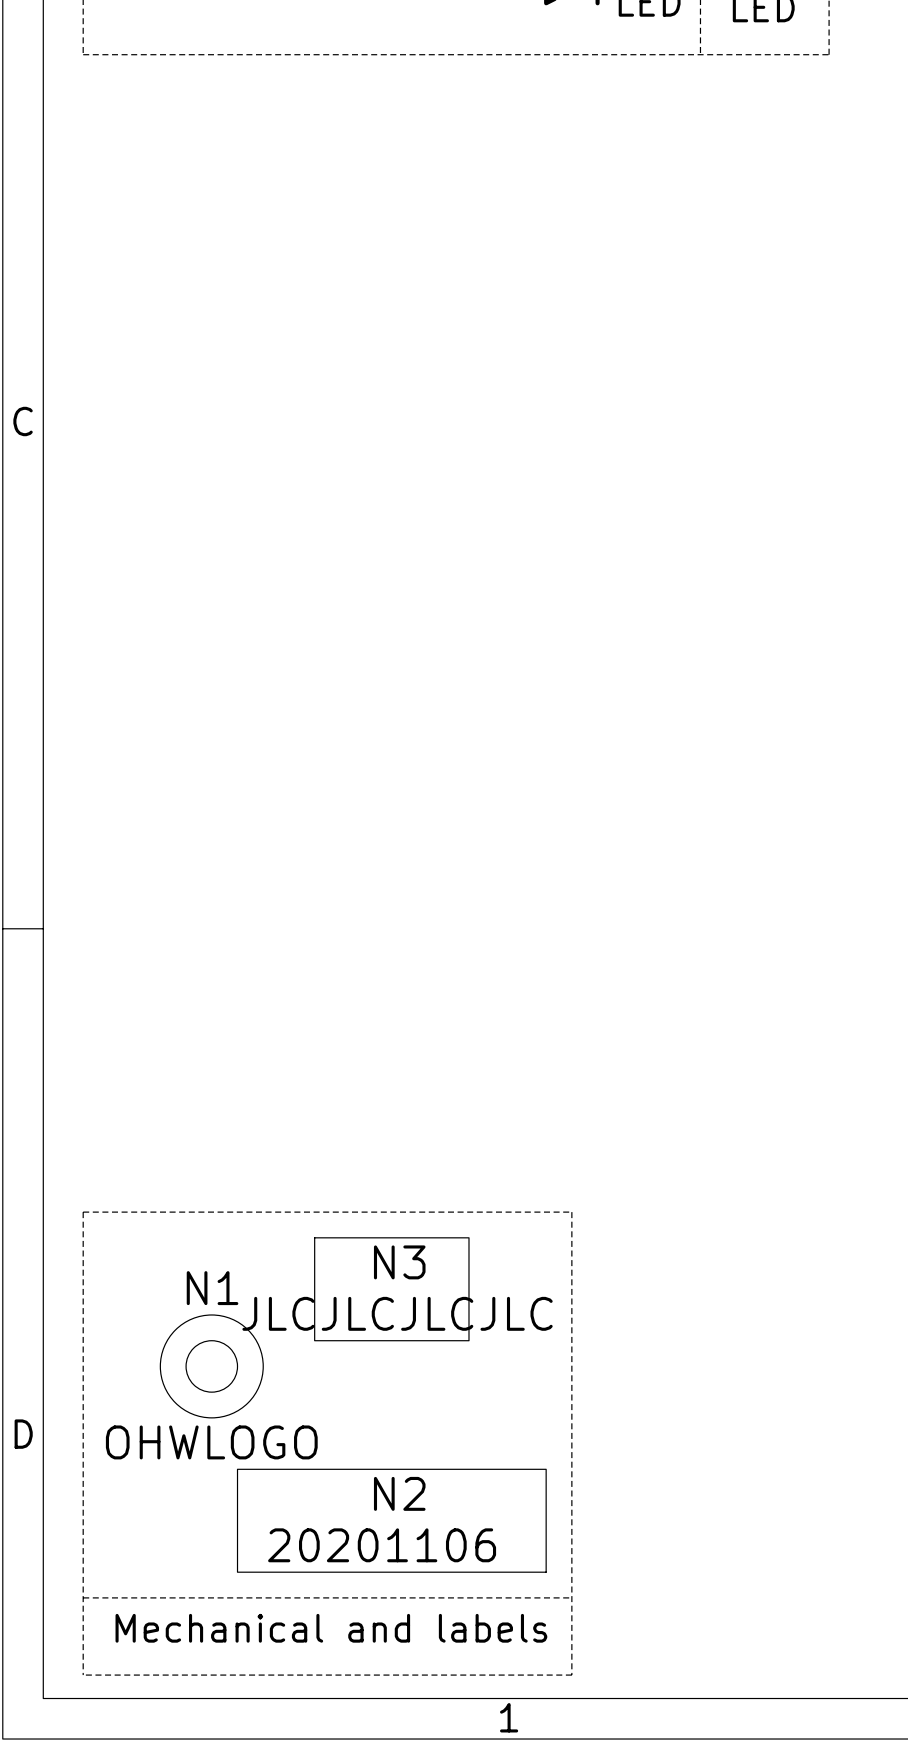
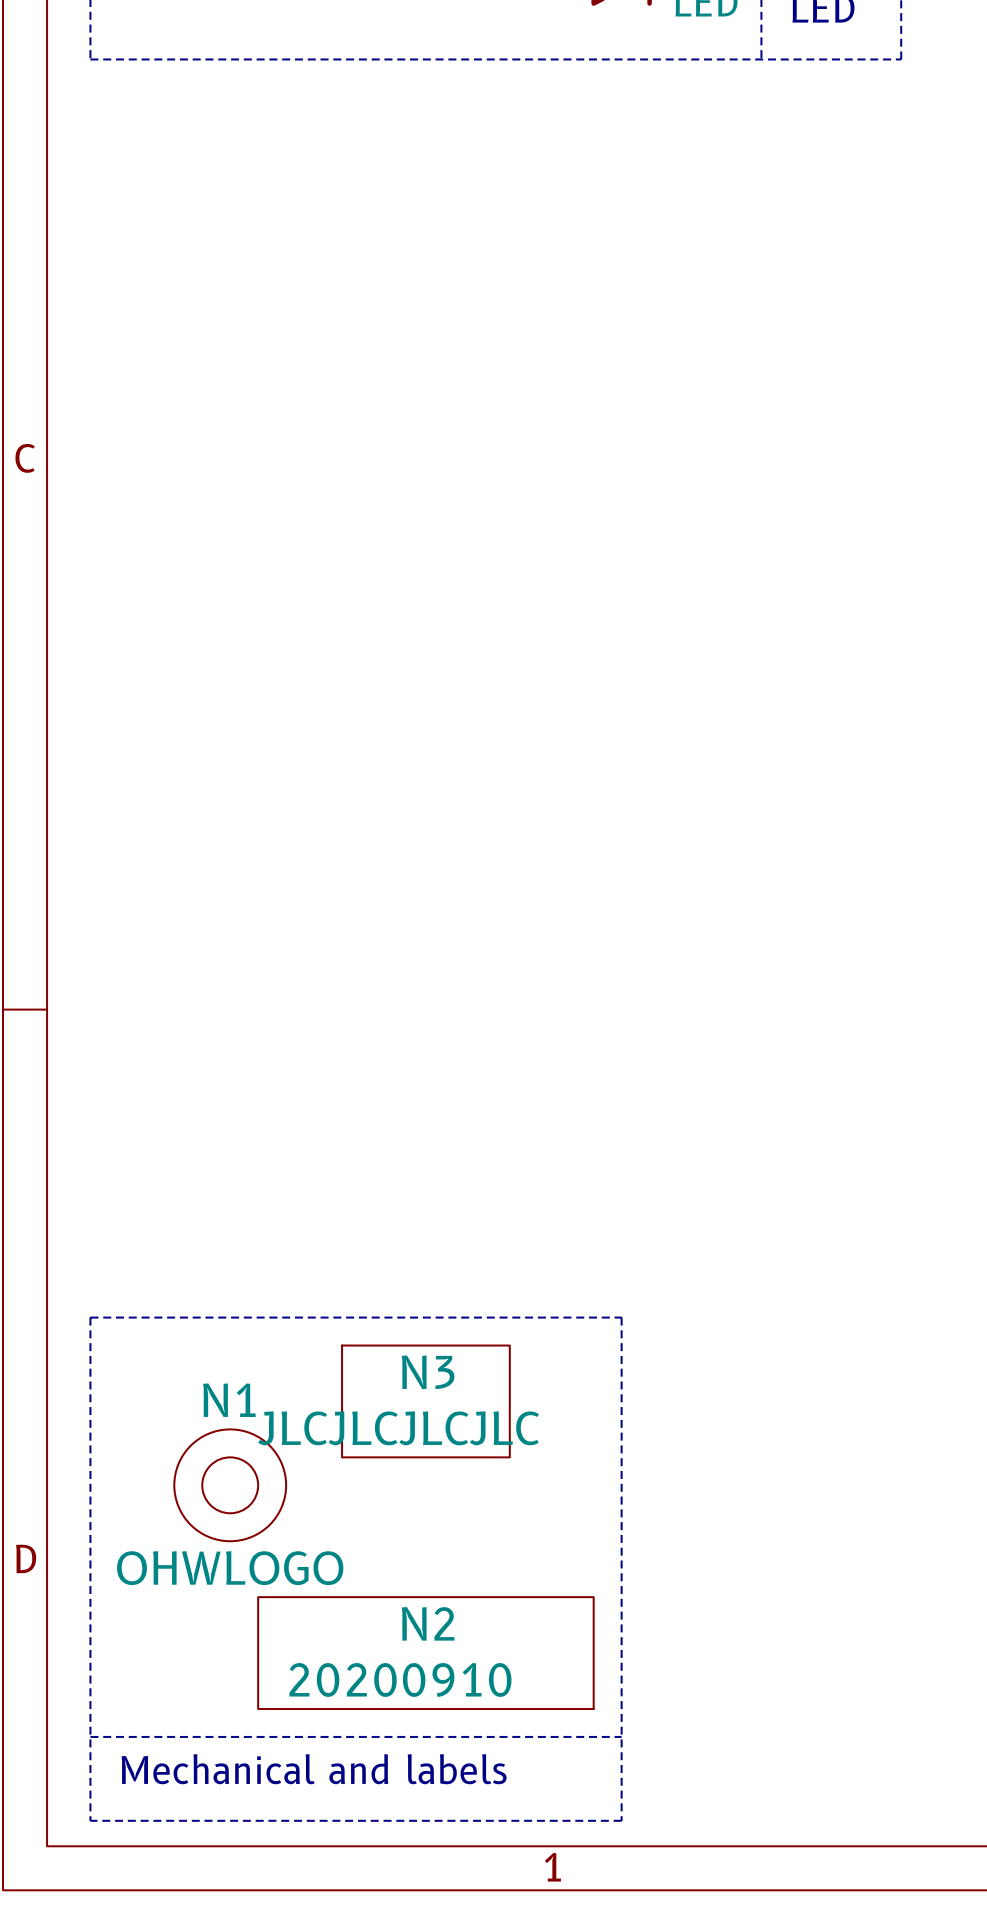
N2 value: 20201106 (382, 1545) -> 20200910 (400, 1679)

